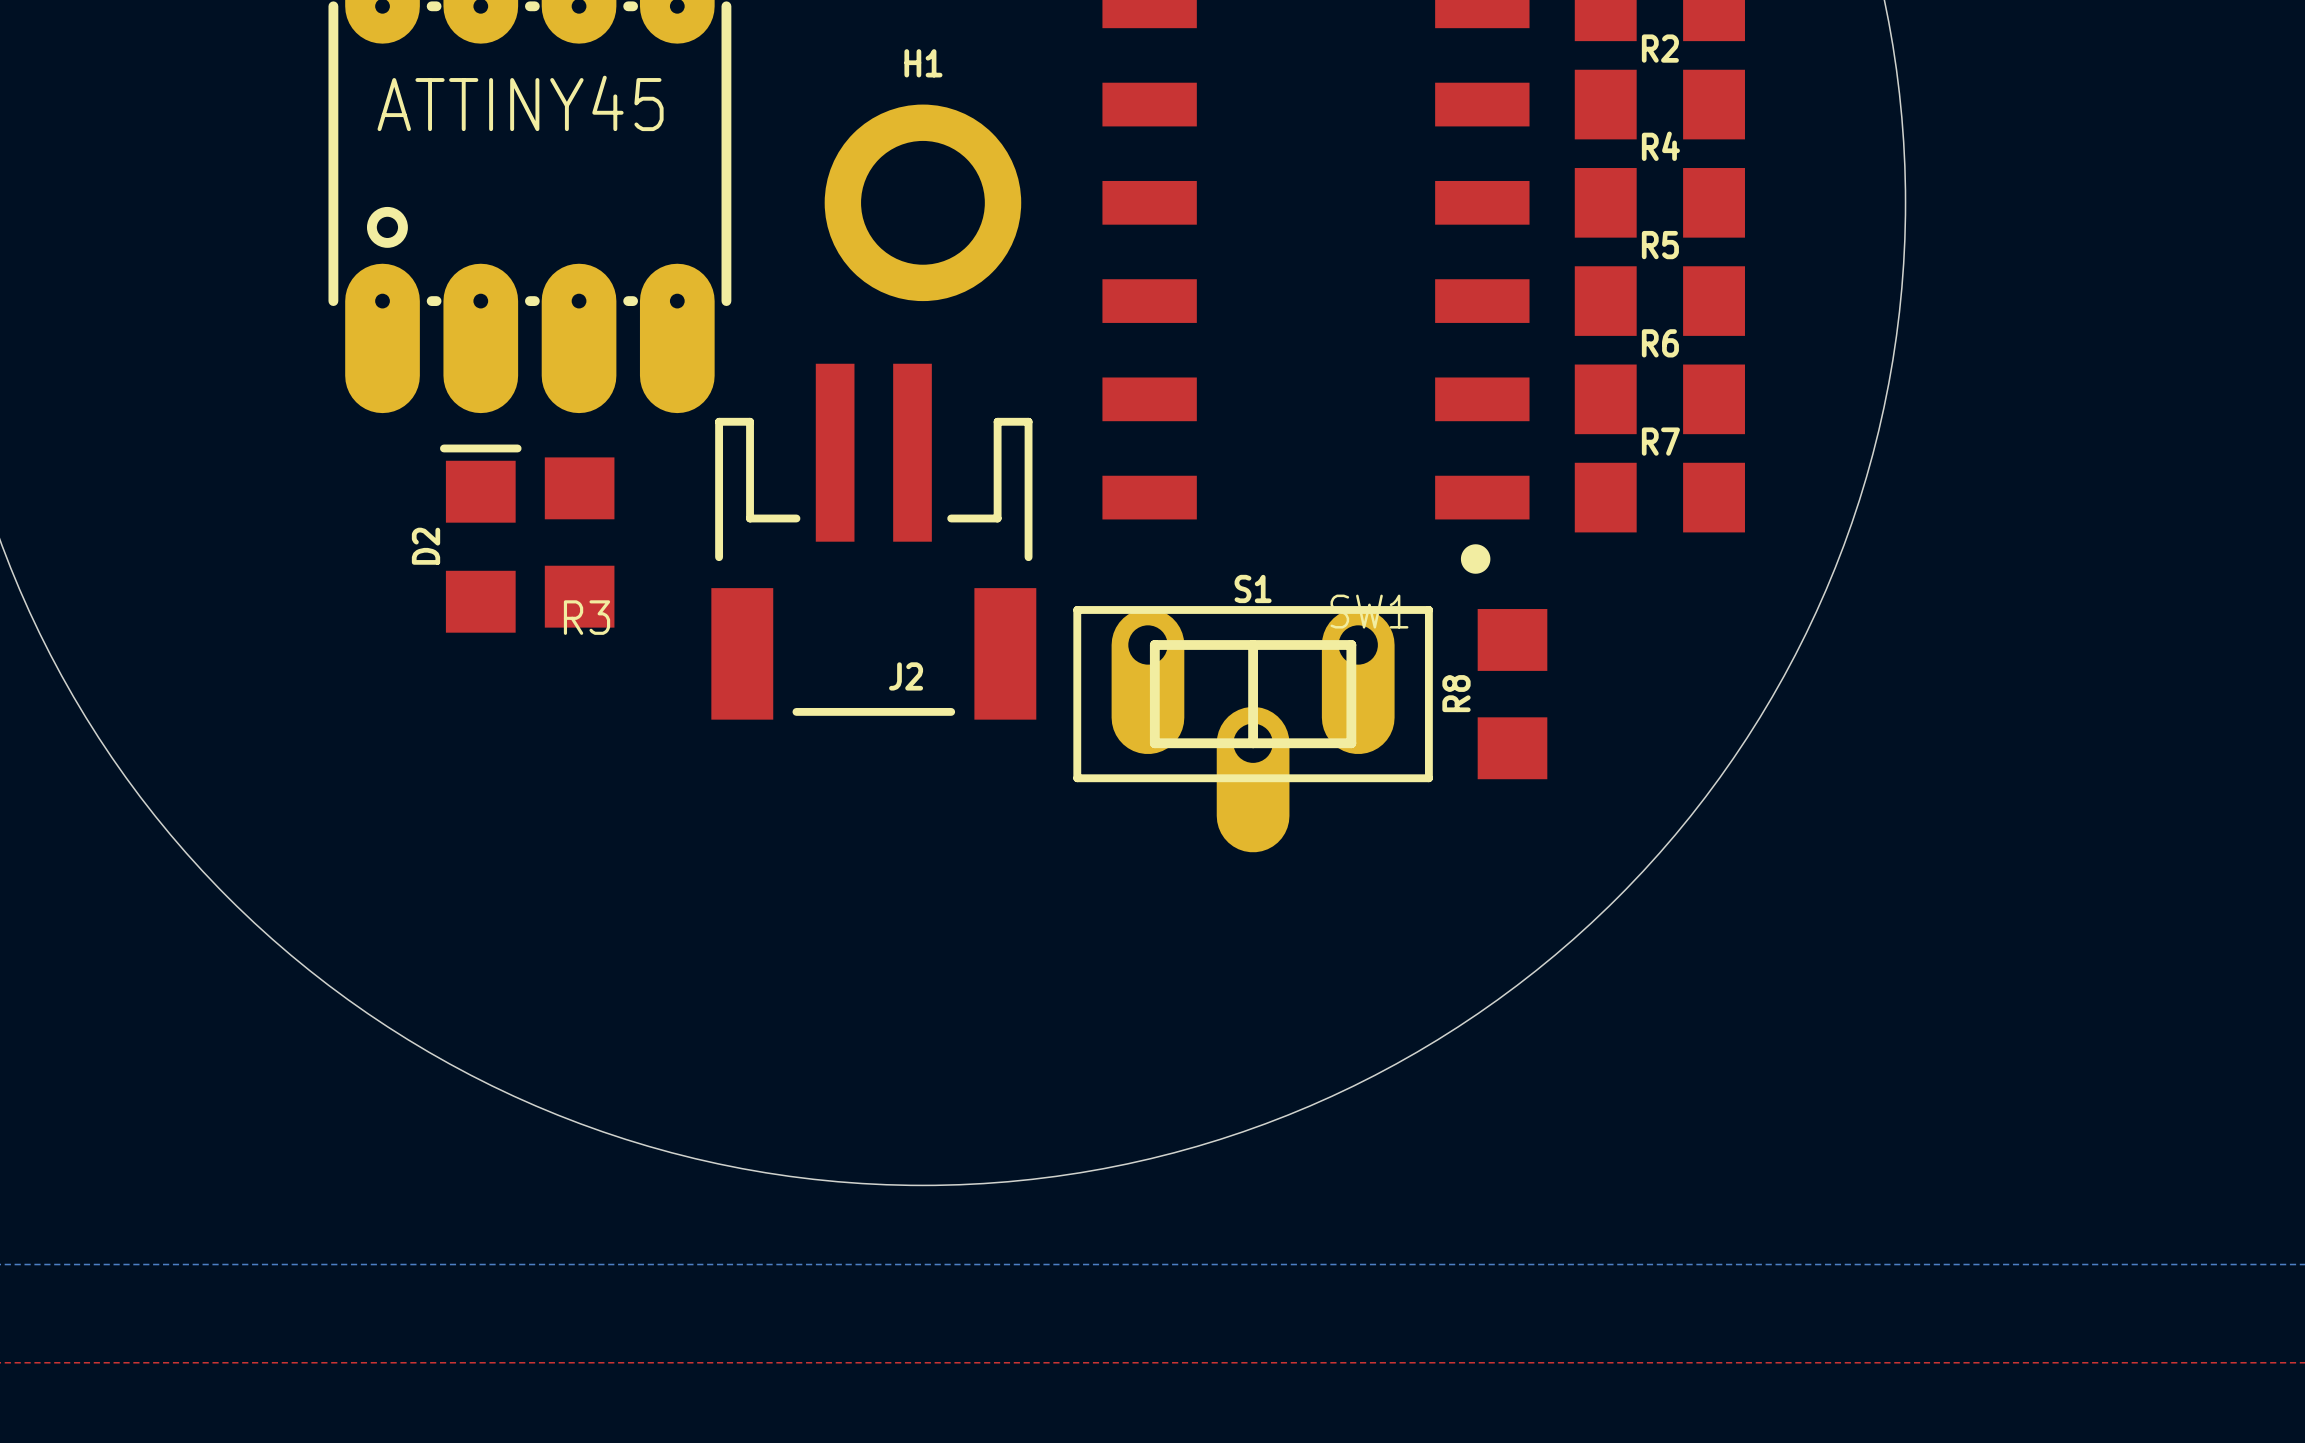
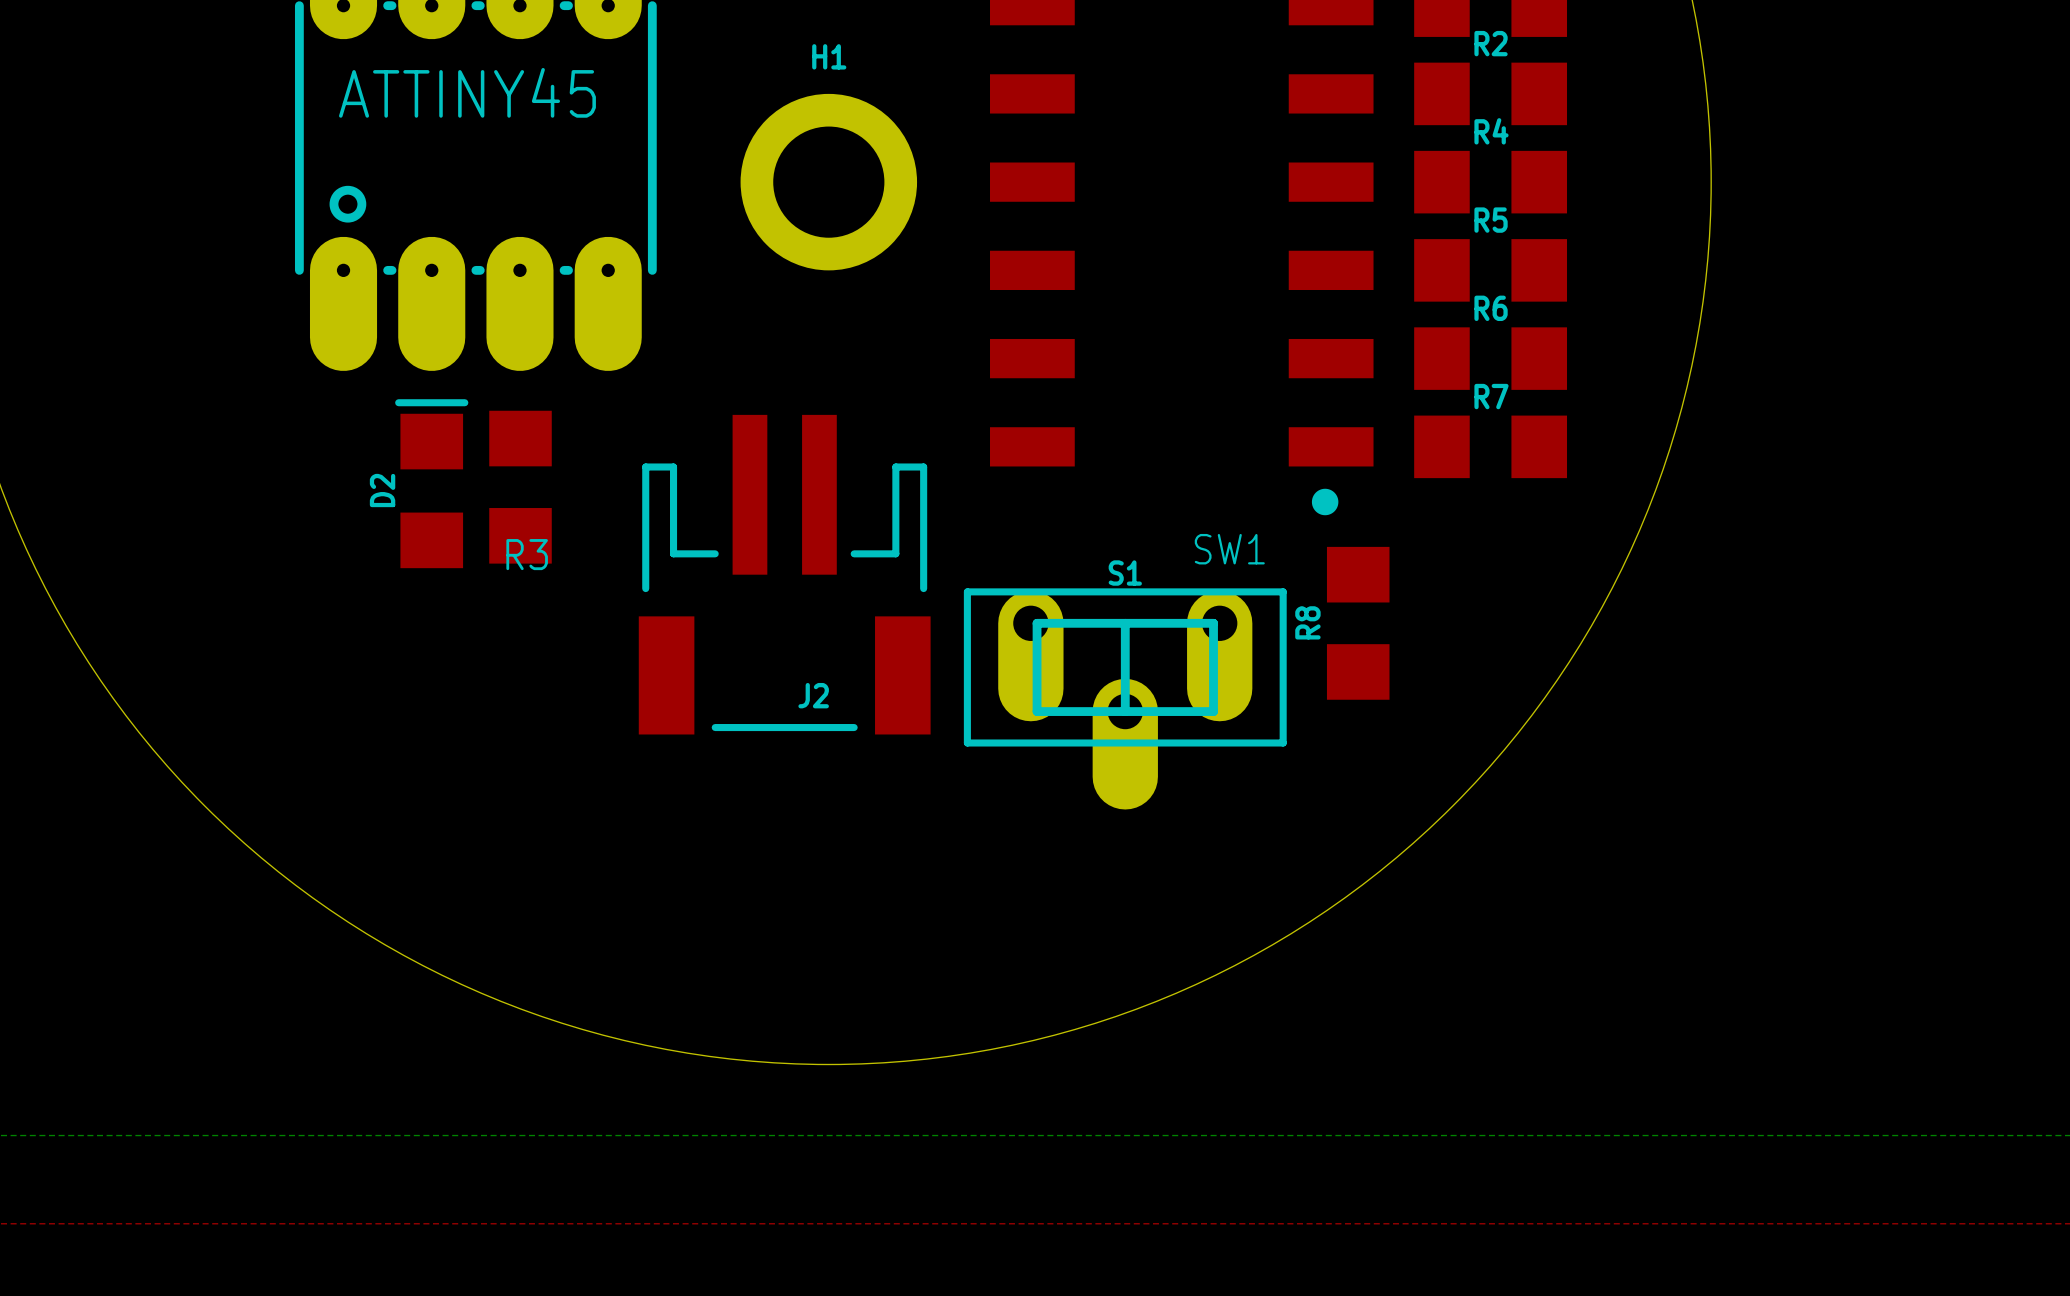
J2 position: (873, 541) -> (784, 574)
S1 position: (1253, 729) -> (1125, 698)

